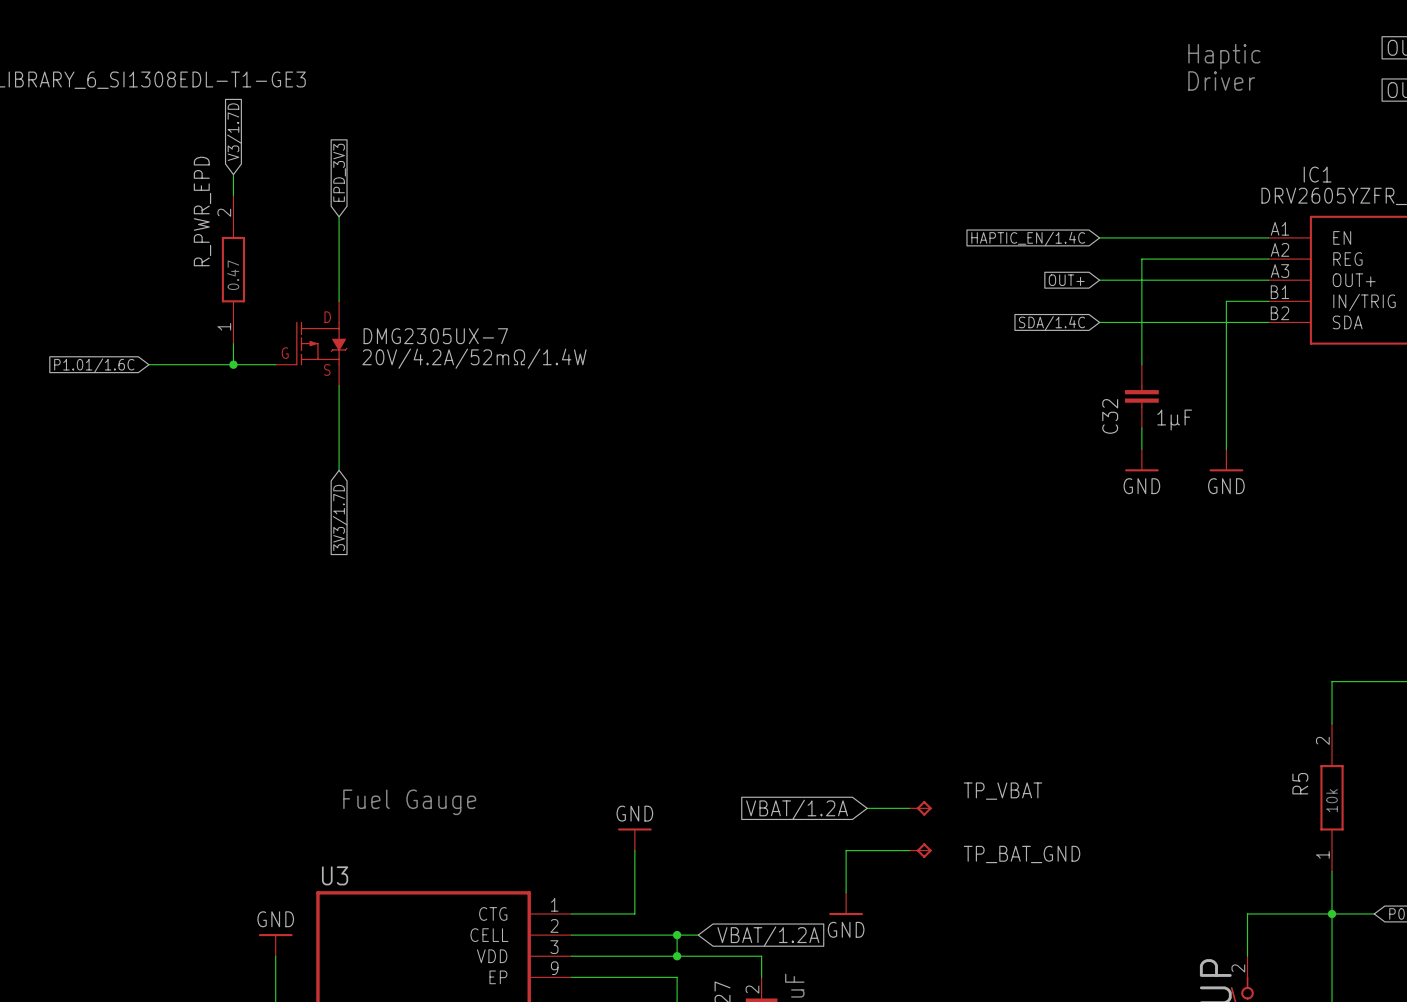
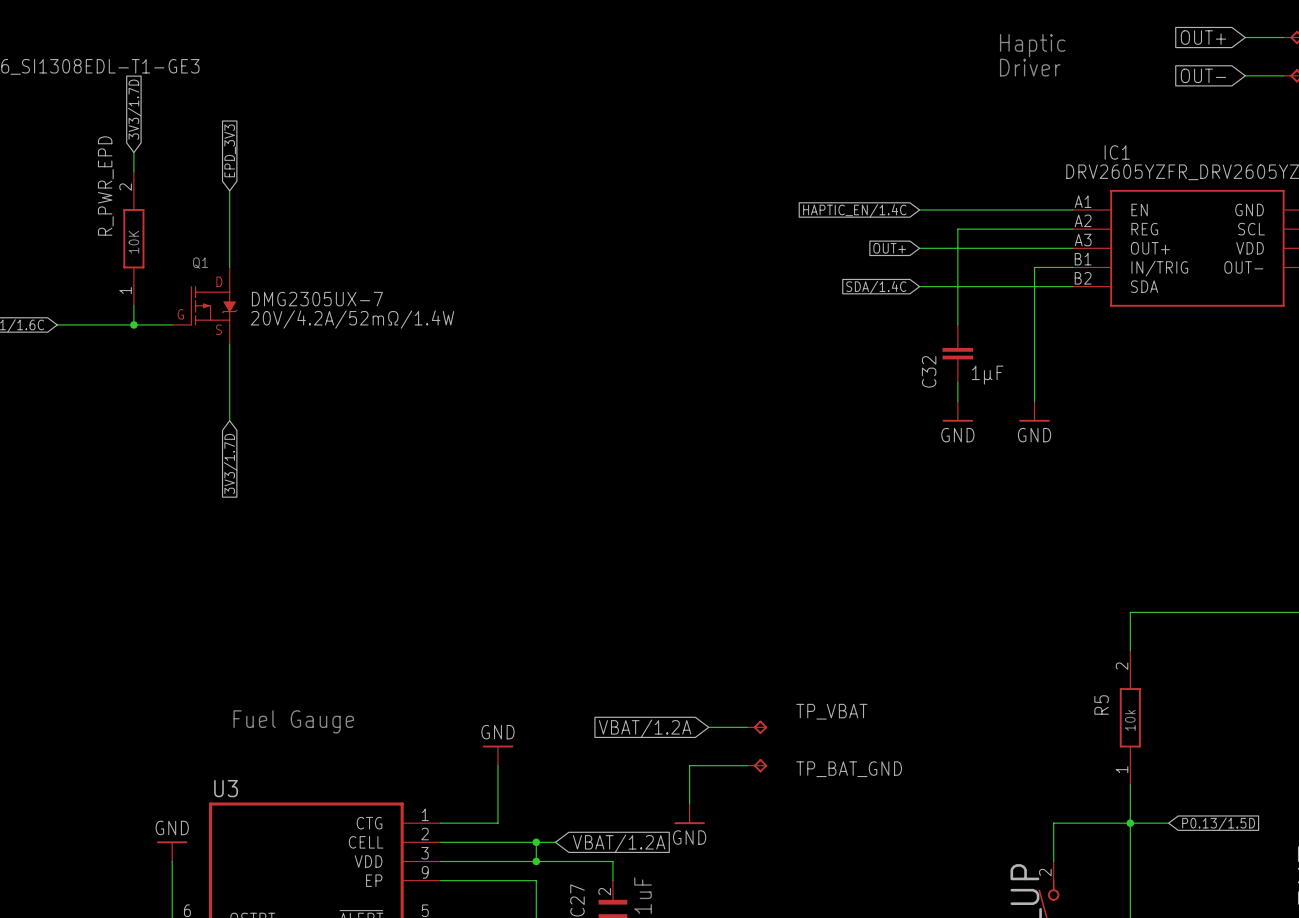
global label: V3/1.7D (234, 132) -> 3V3/1.7D (134, 109)
text: 0.47 (233, 275) -> 10K (133, 242)
text: none -> Q1 (200, 263)

